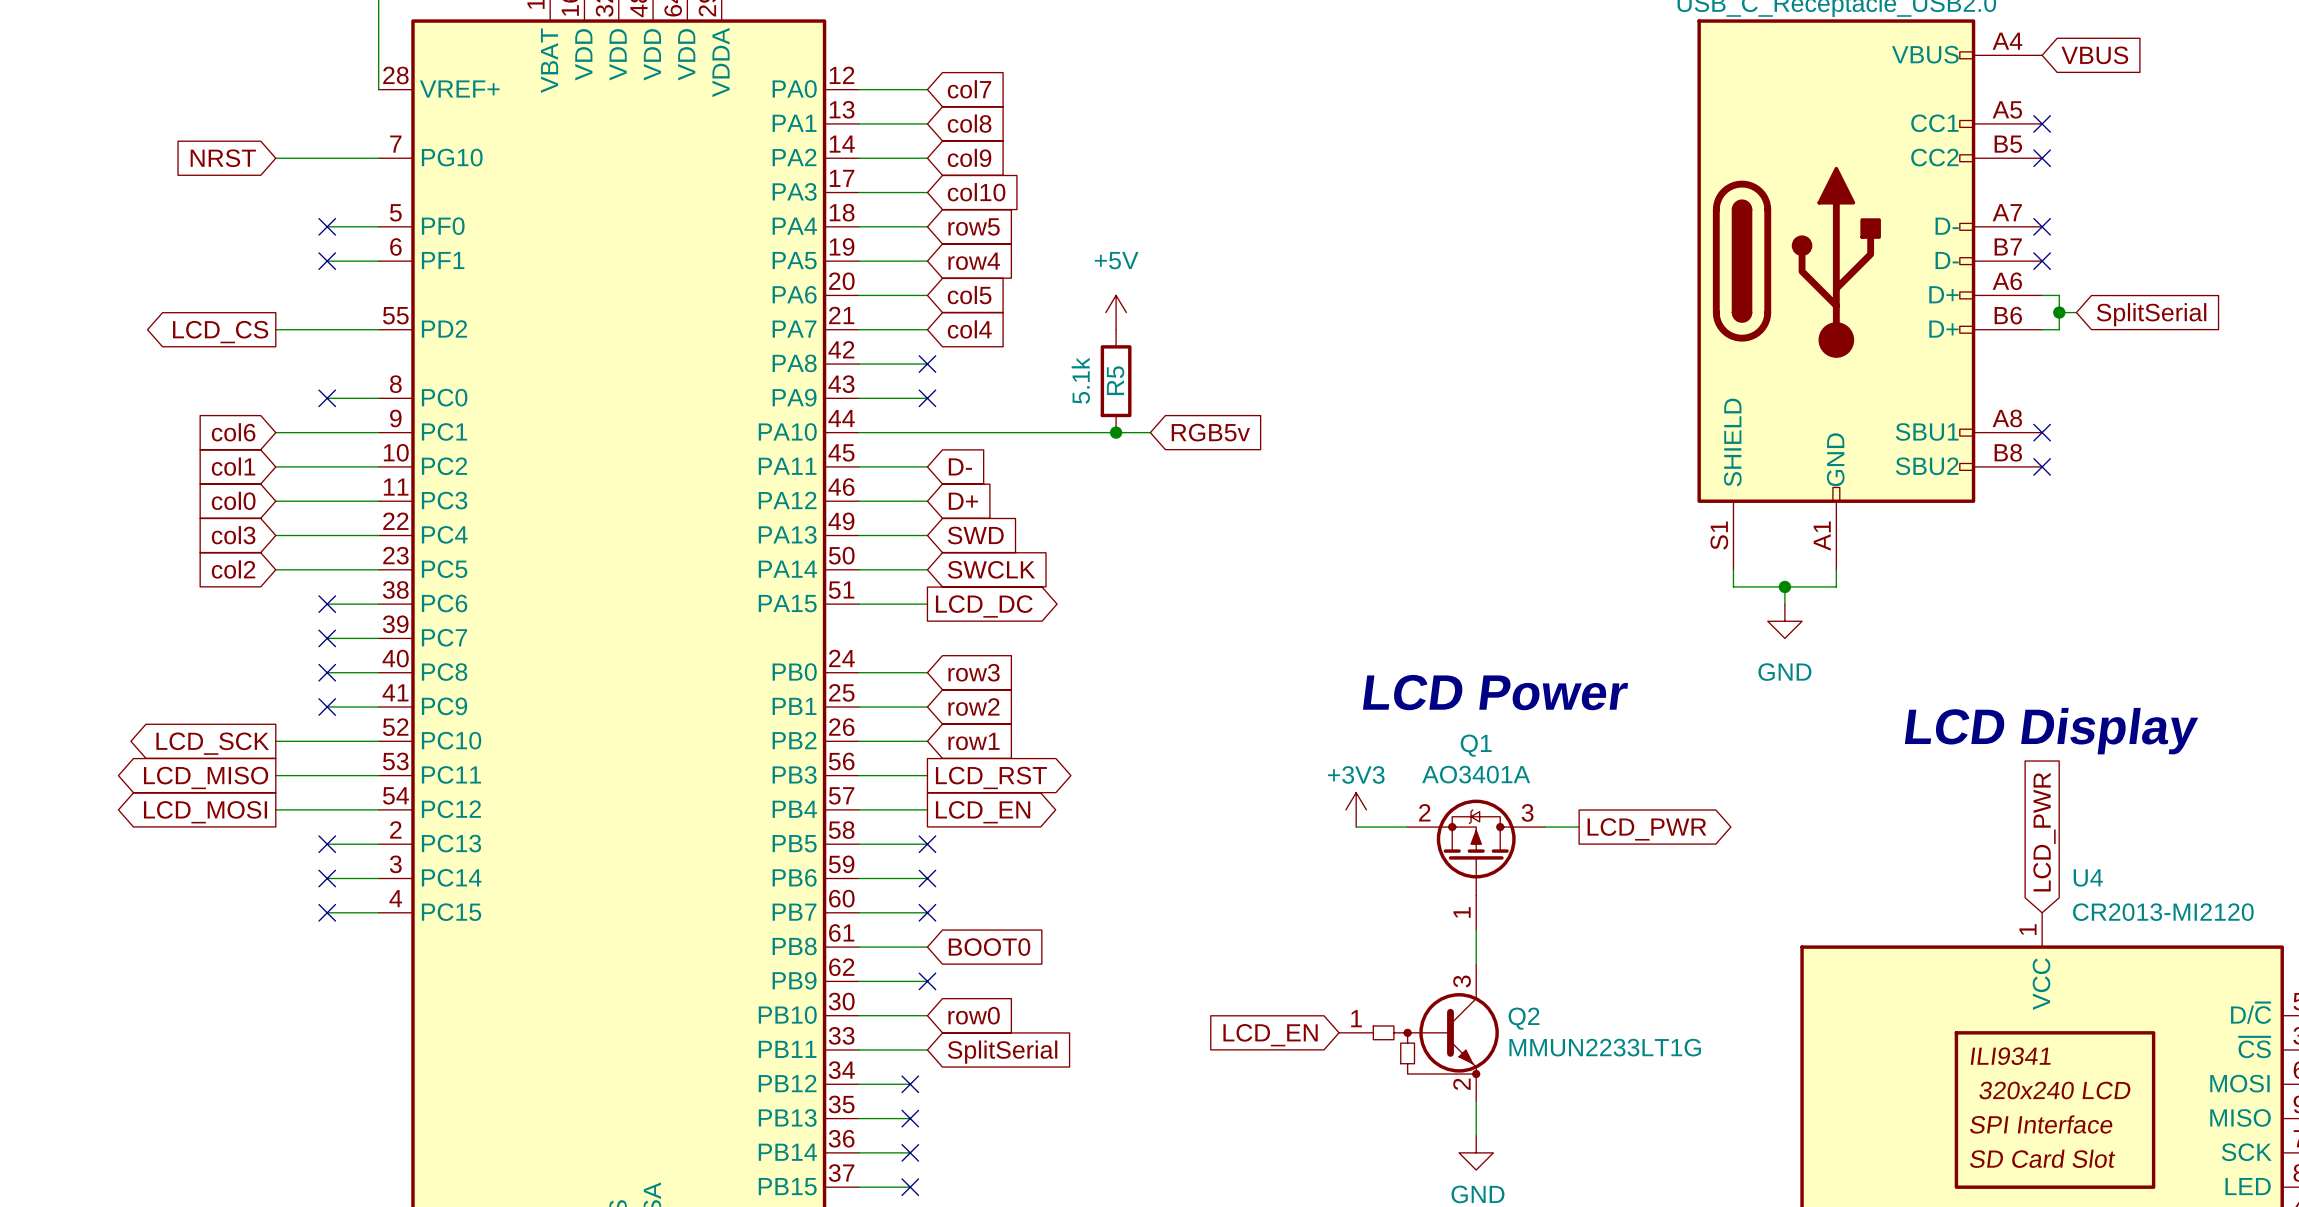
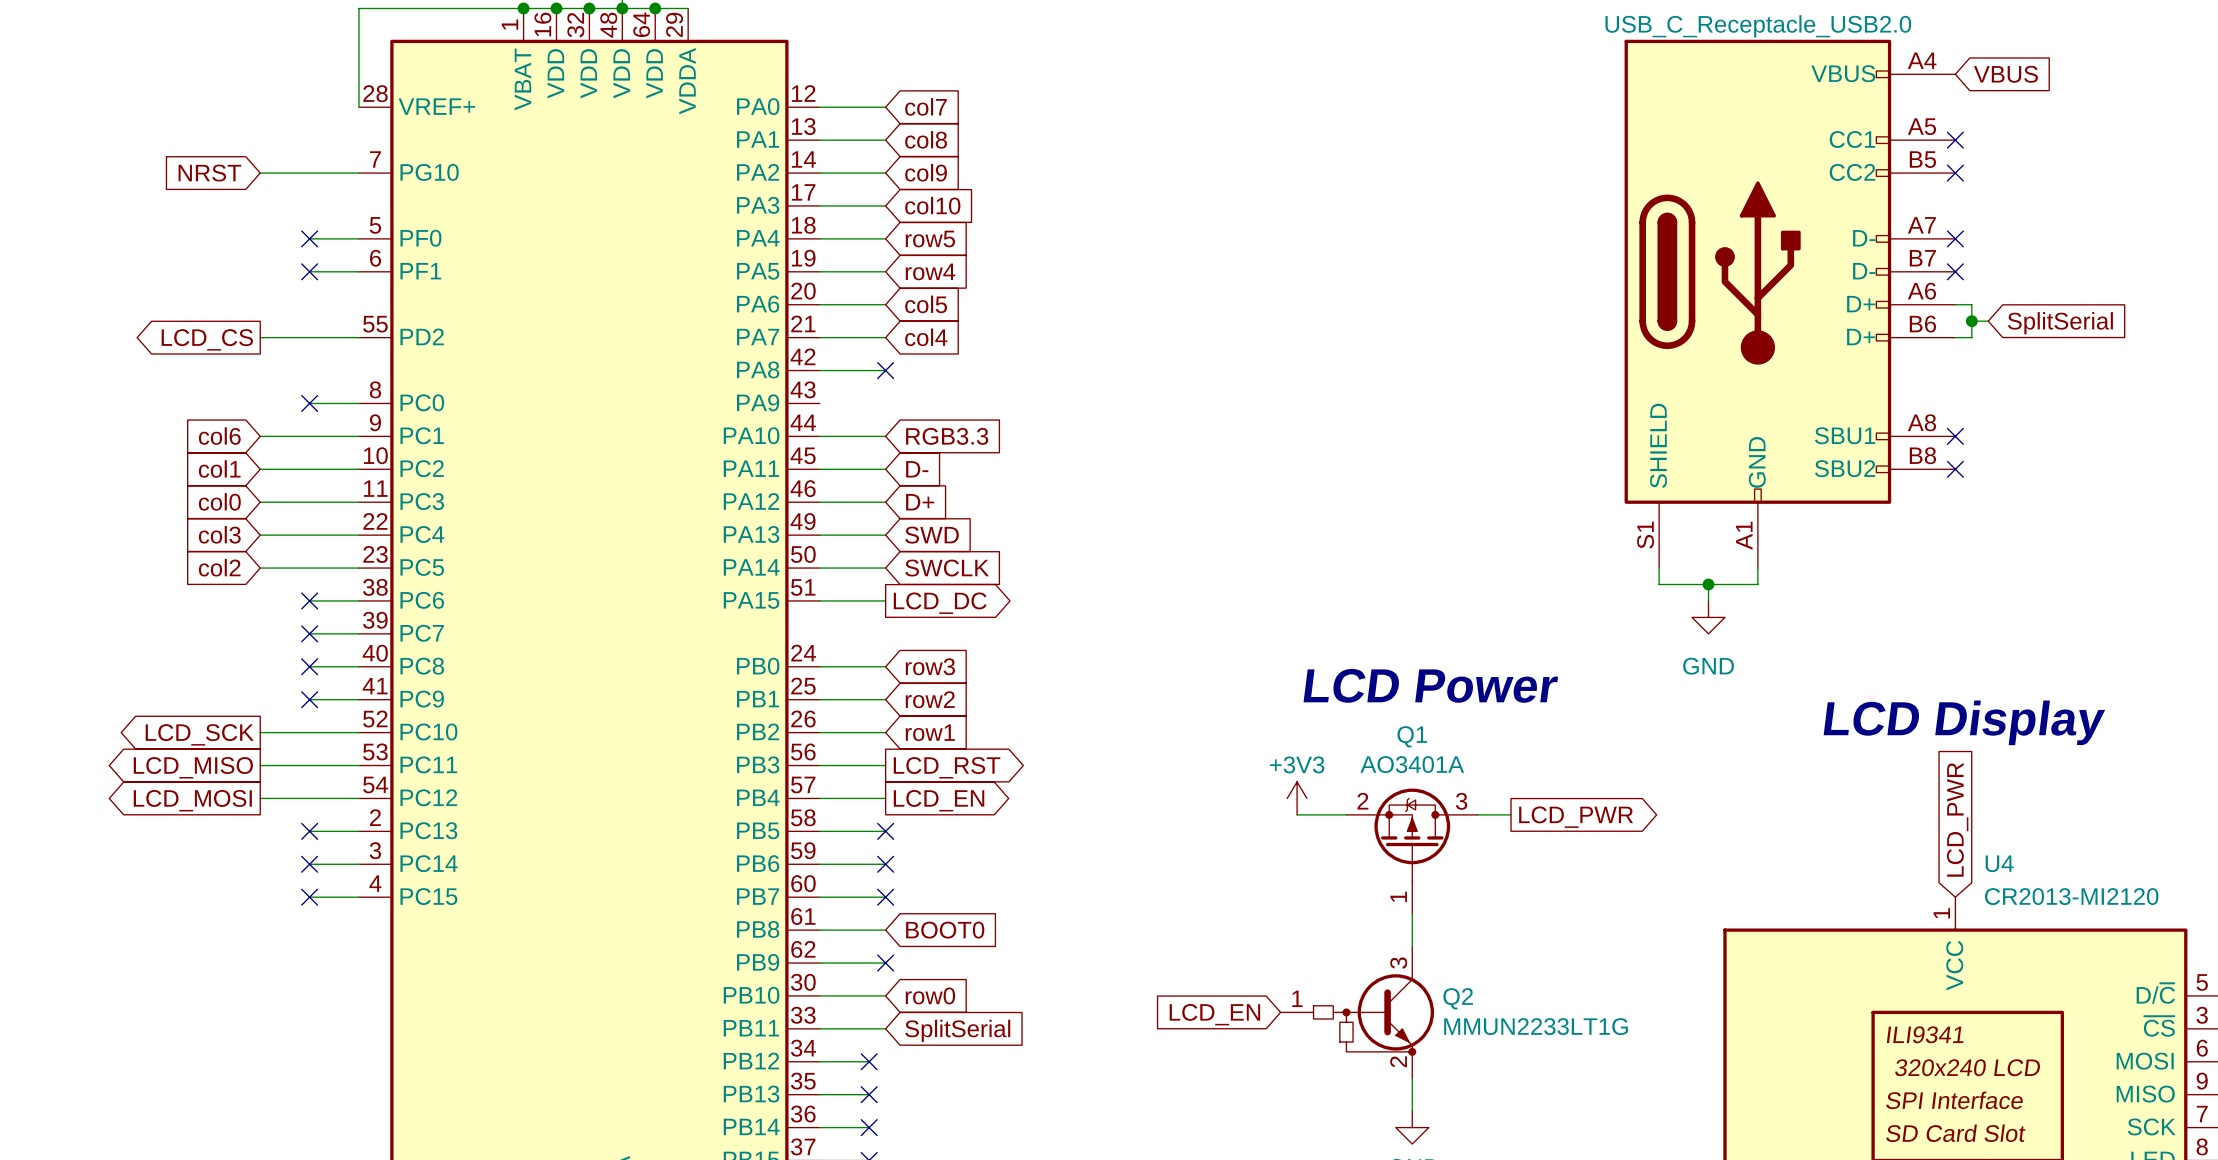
power symbol: +5V (1116, 312) -> none
R5: 5.1k (1116, 381) -> none
wire: (858, 398) (927, 398) -> none
no-connect mark: (927, 398) -> none
wire: (927, 432) (1150, 432) -> none
global label: none -> RGB3.3 (947, 436)
junction: (1116, 432) -> none
global label: RGB5v (1210, 432) -> none

